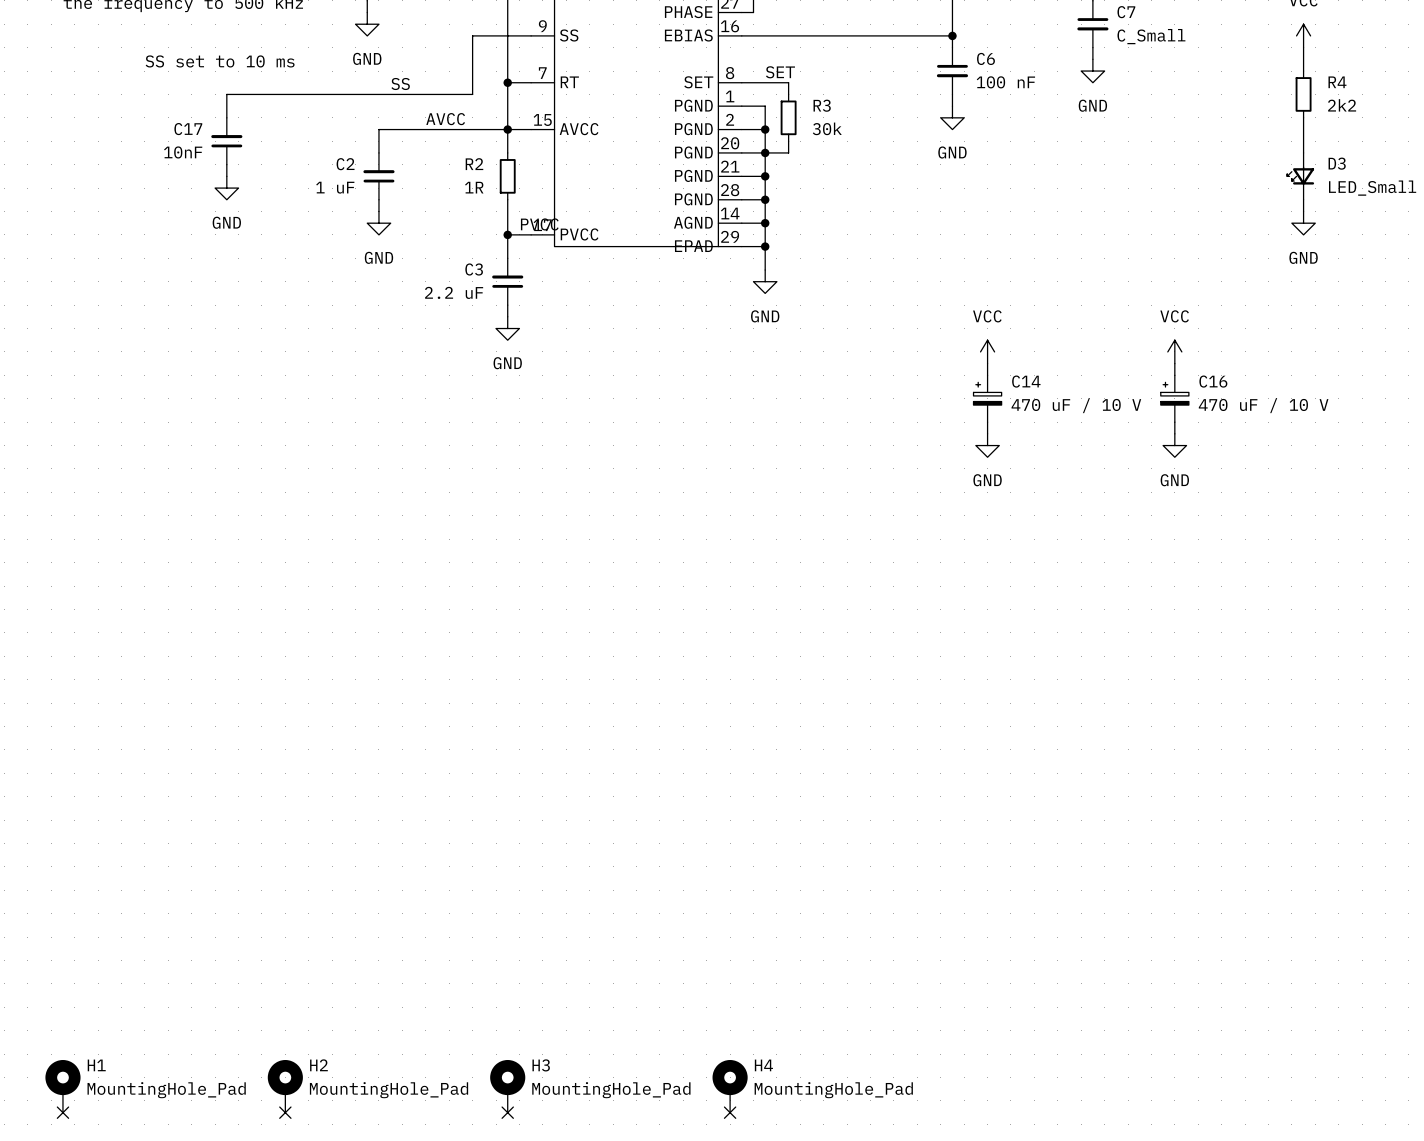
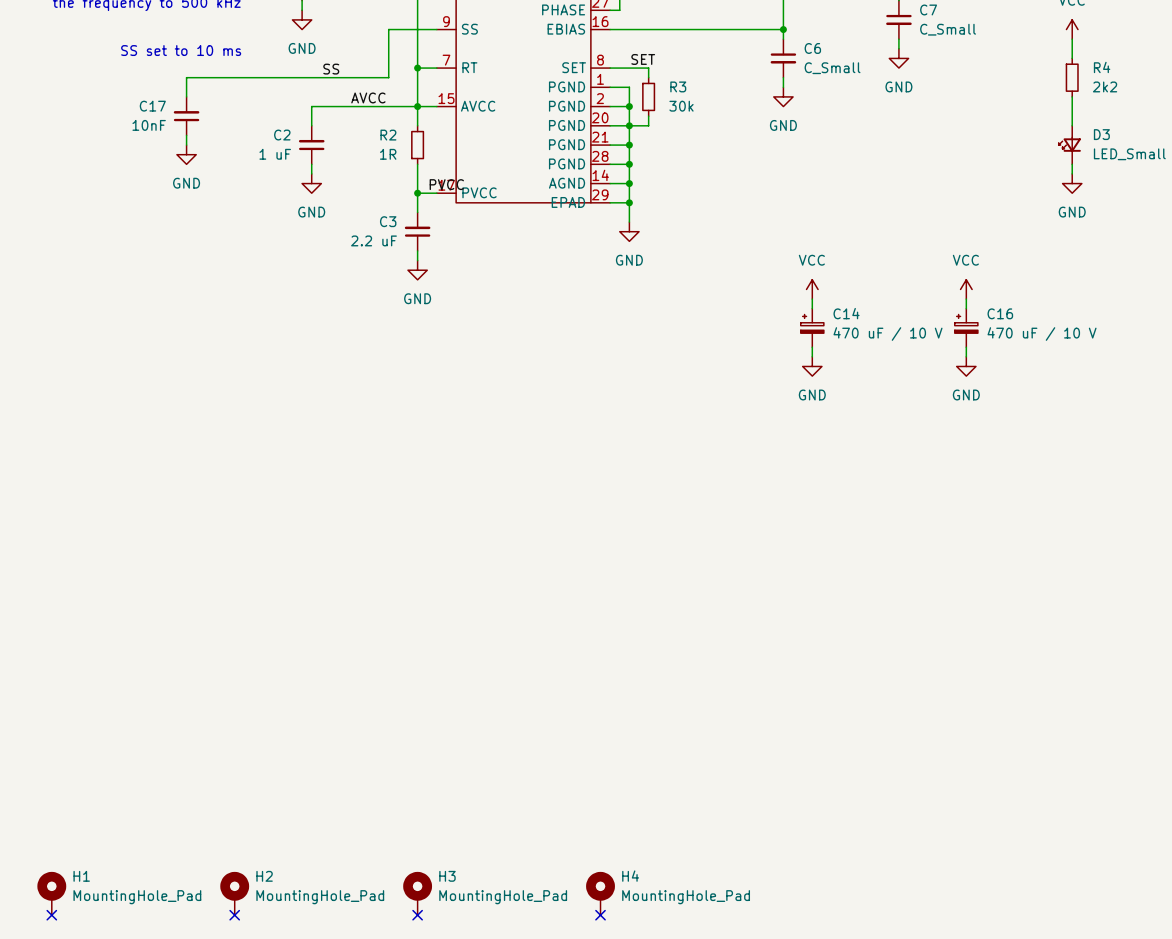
C6 value: 100 nF (1005, 82) -> C_Small (832, 68)

